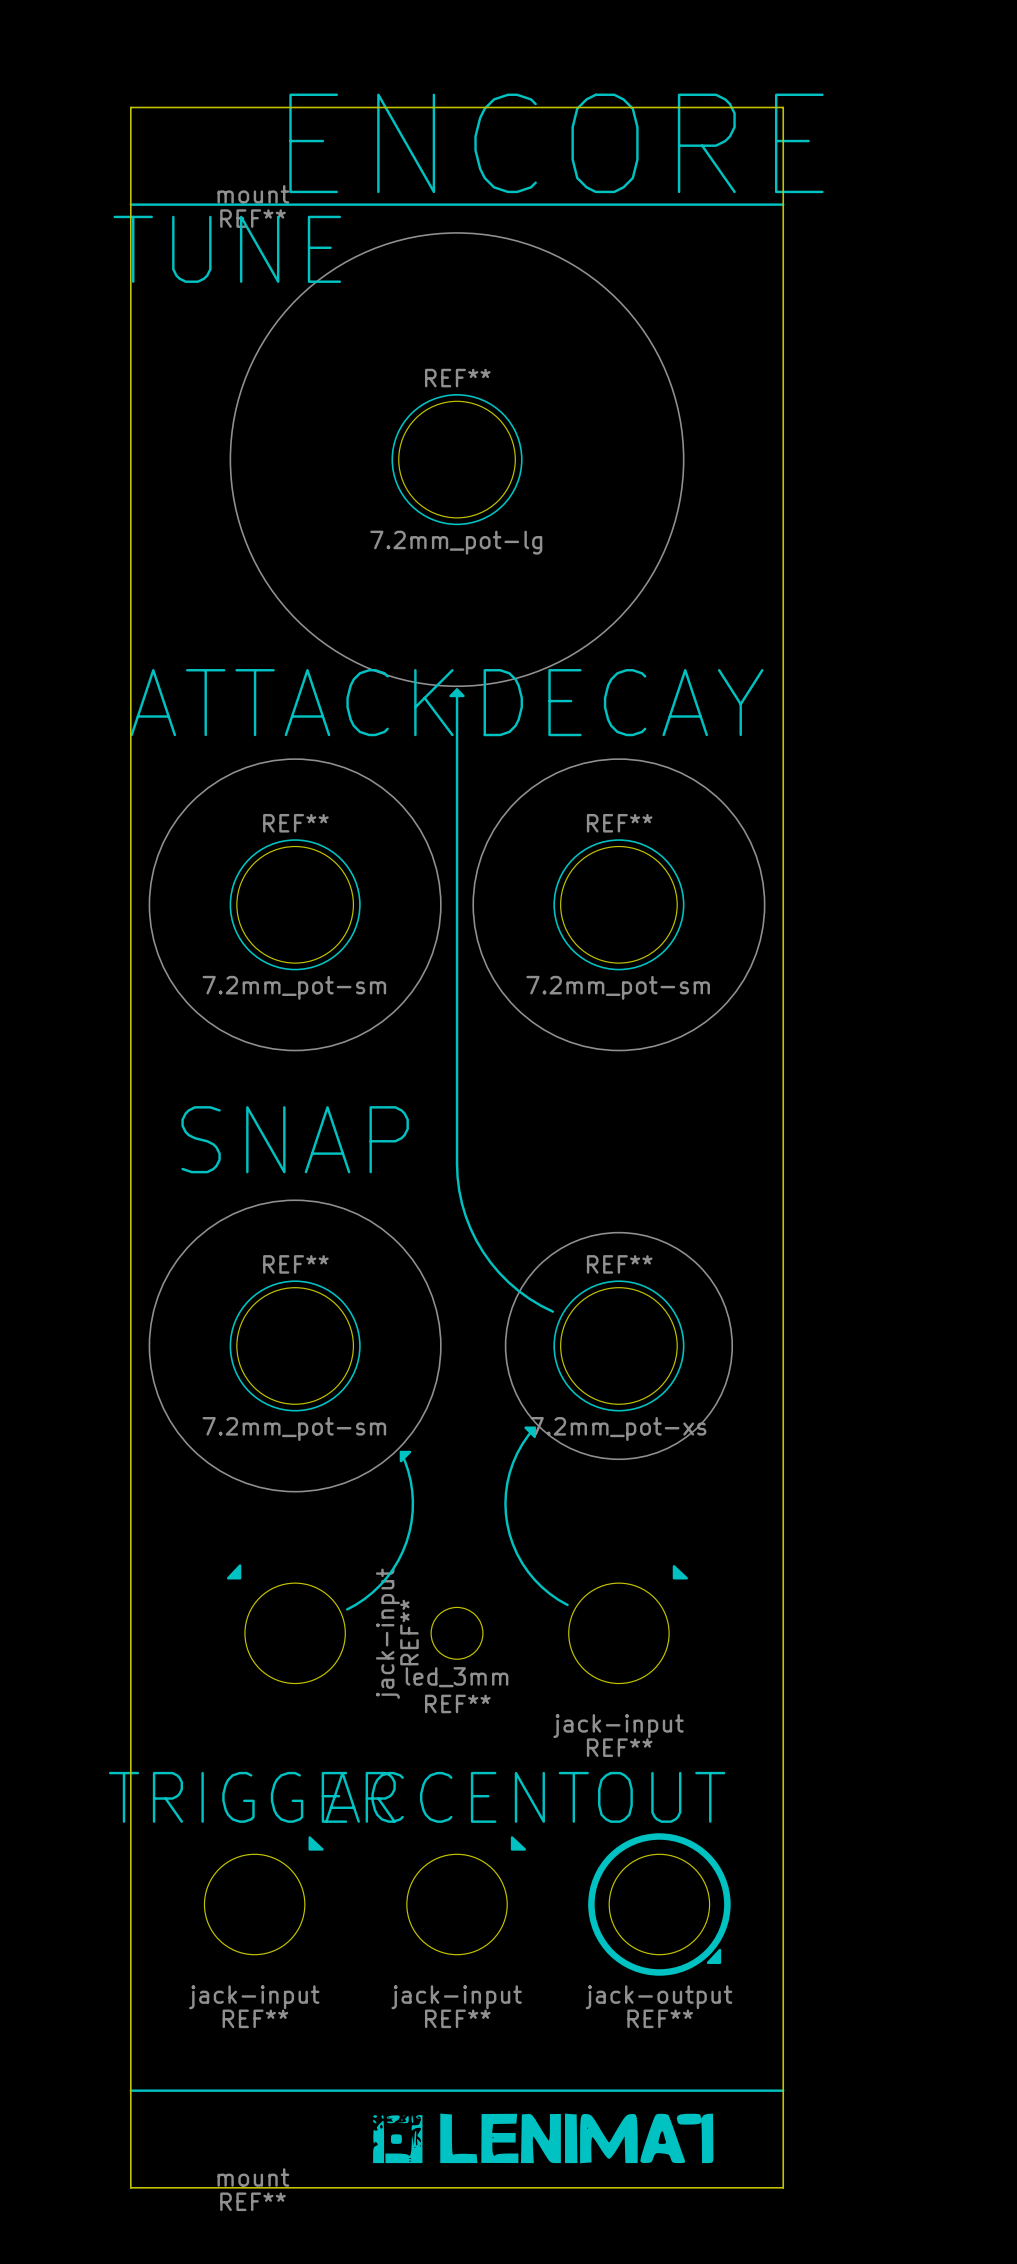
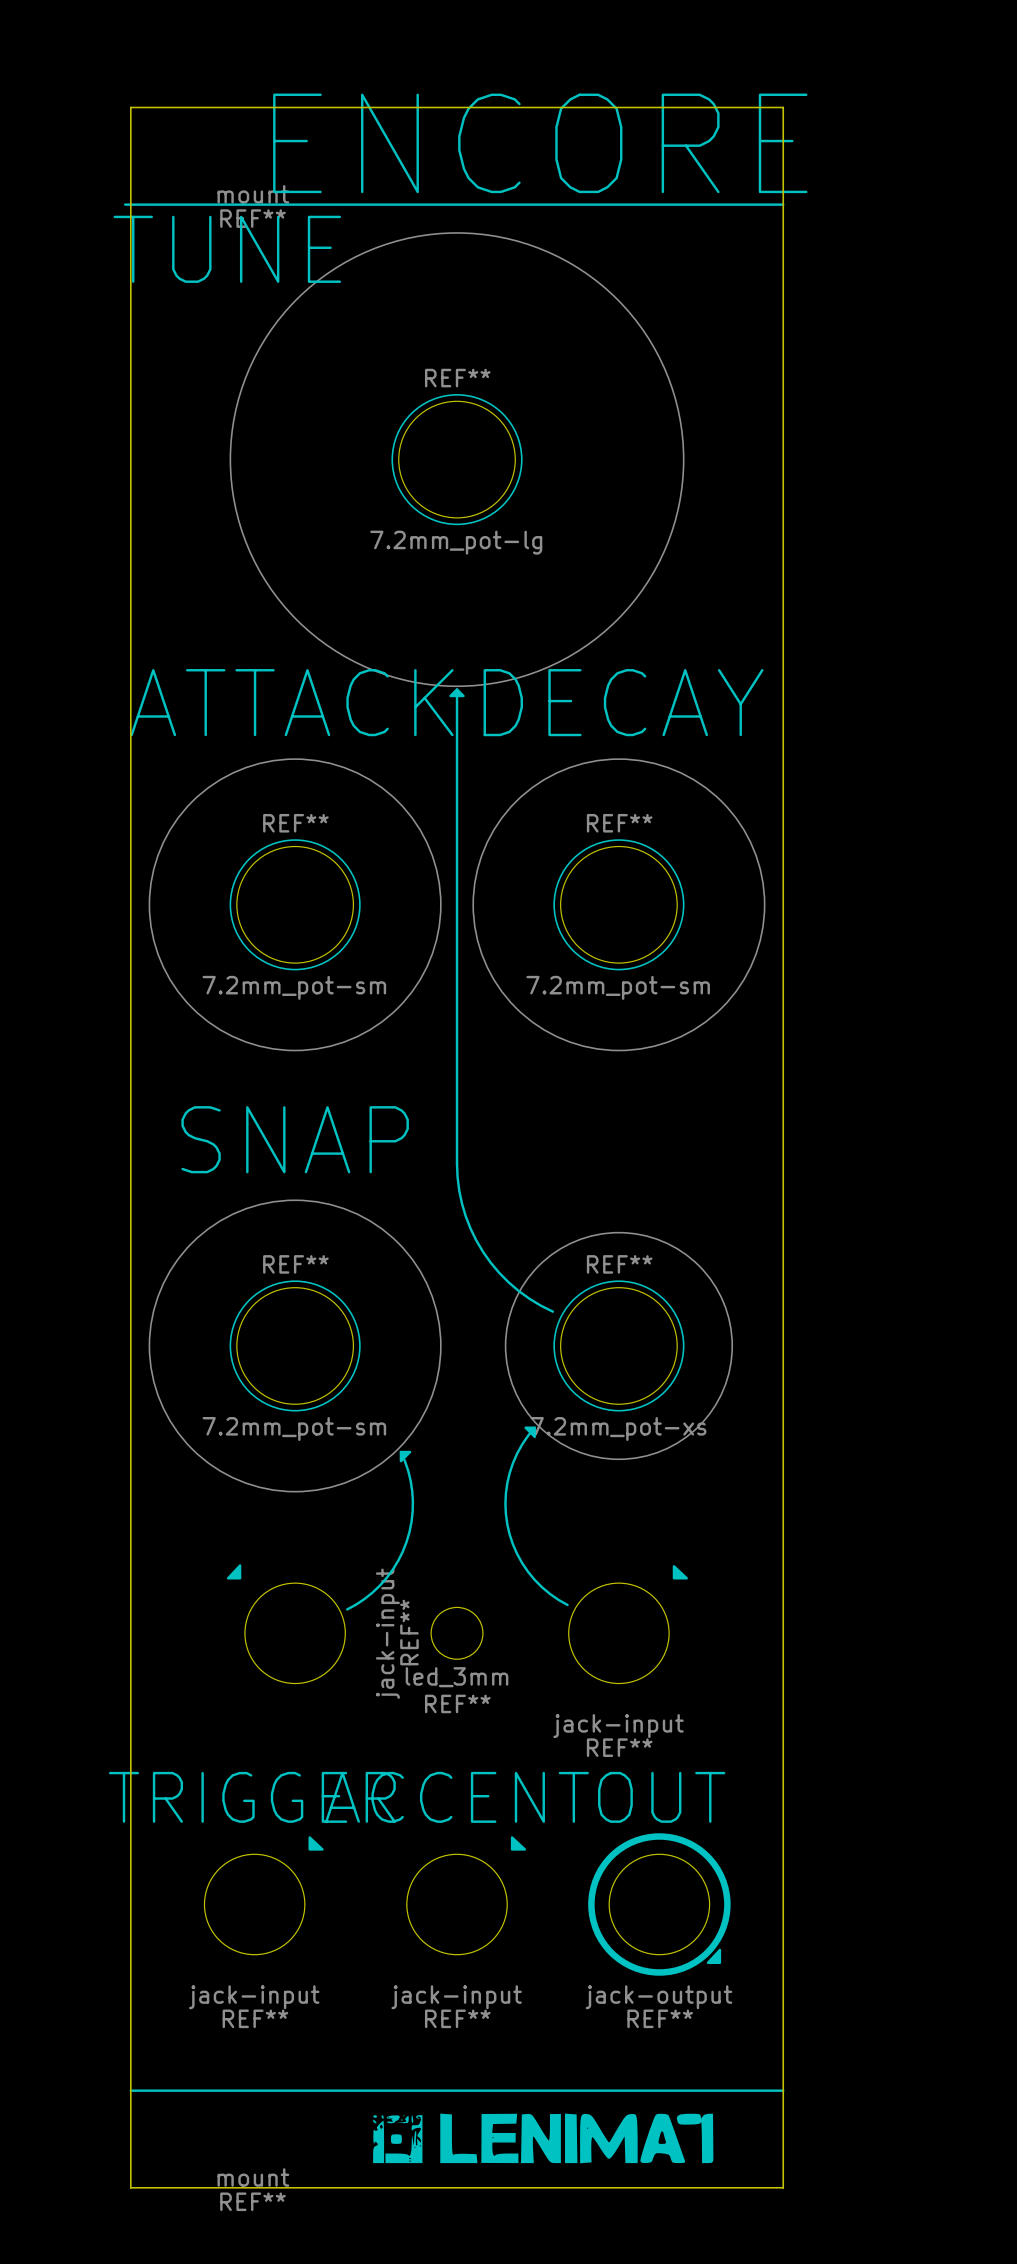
text position: ENCORE (556, 143) -> ENCORE (540, 143)
line: none -> (125, 204) (130, 204)

